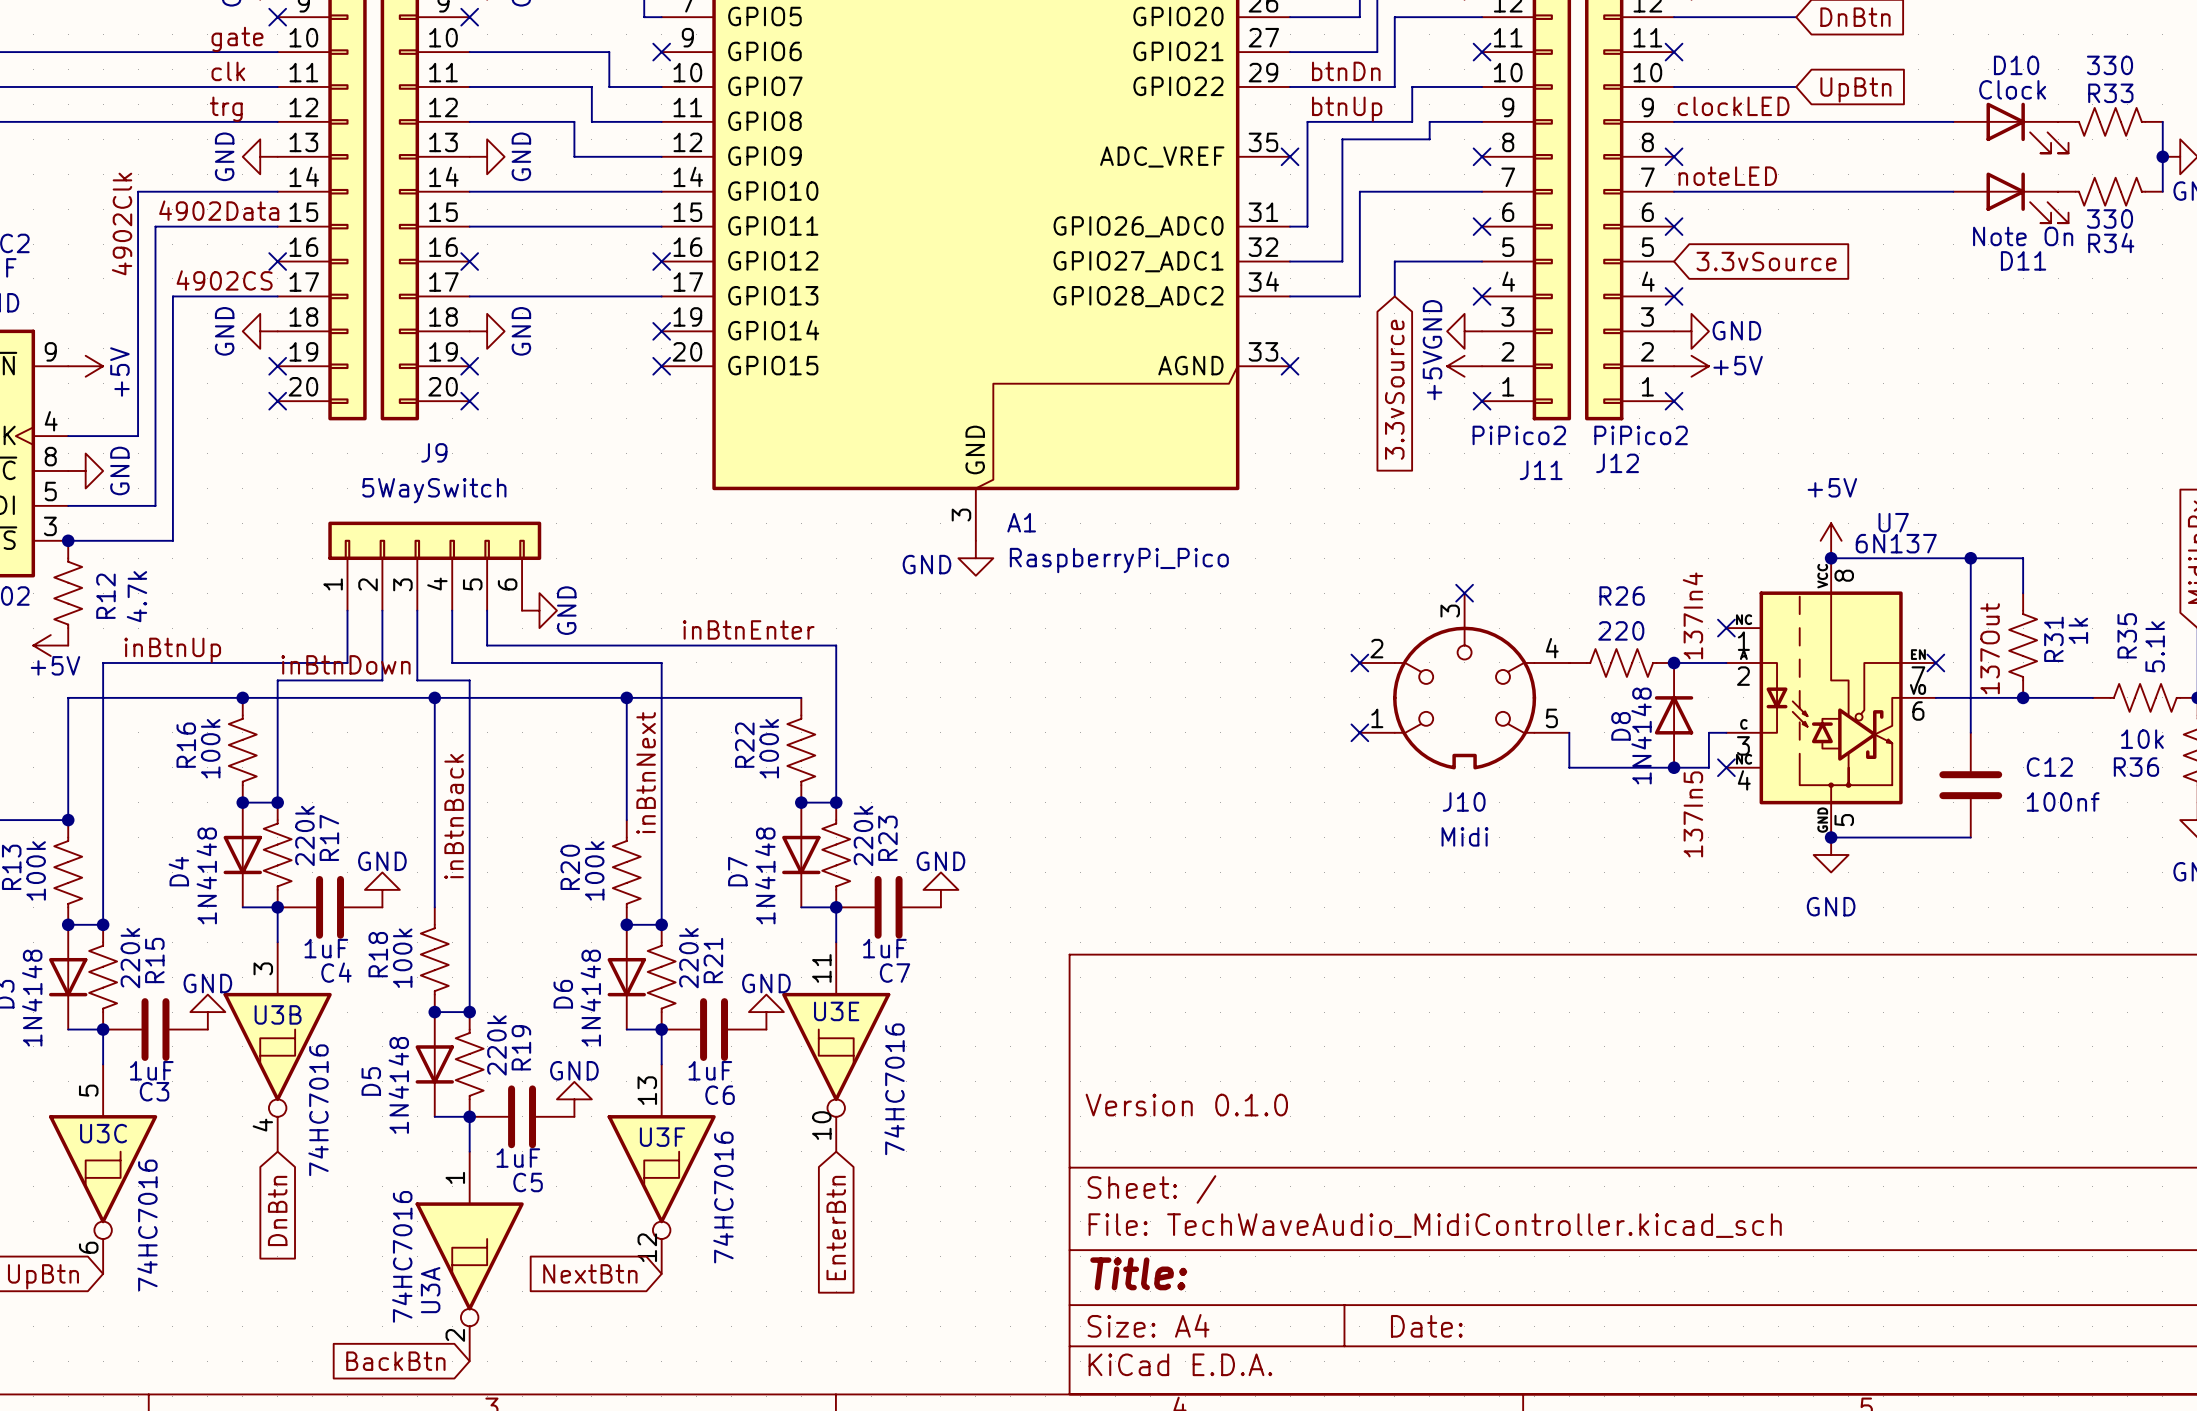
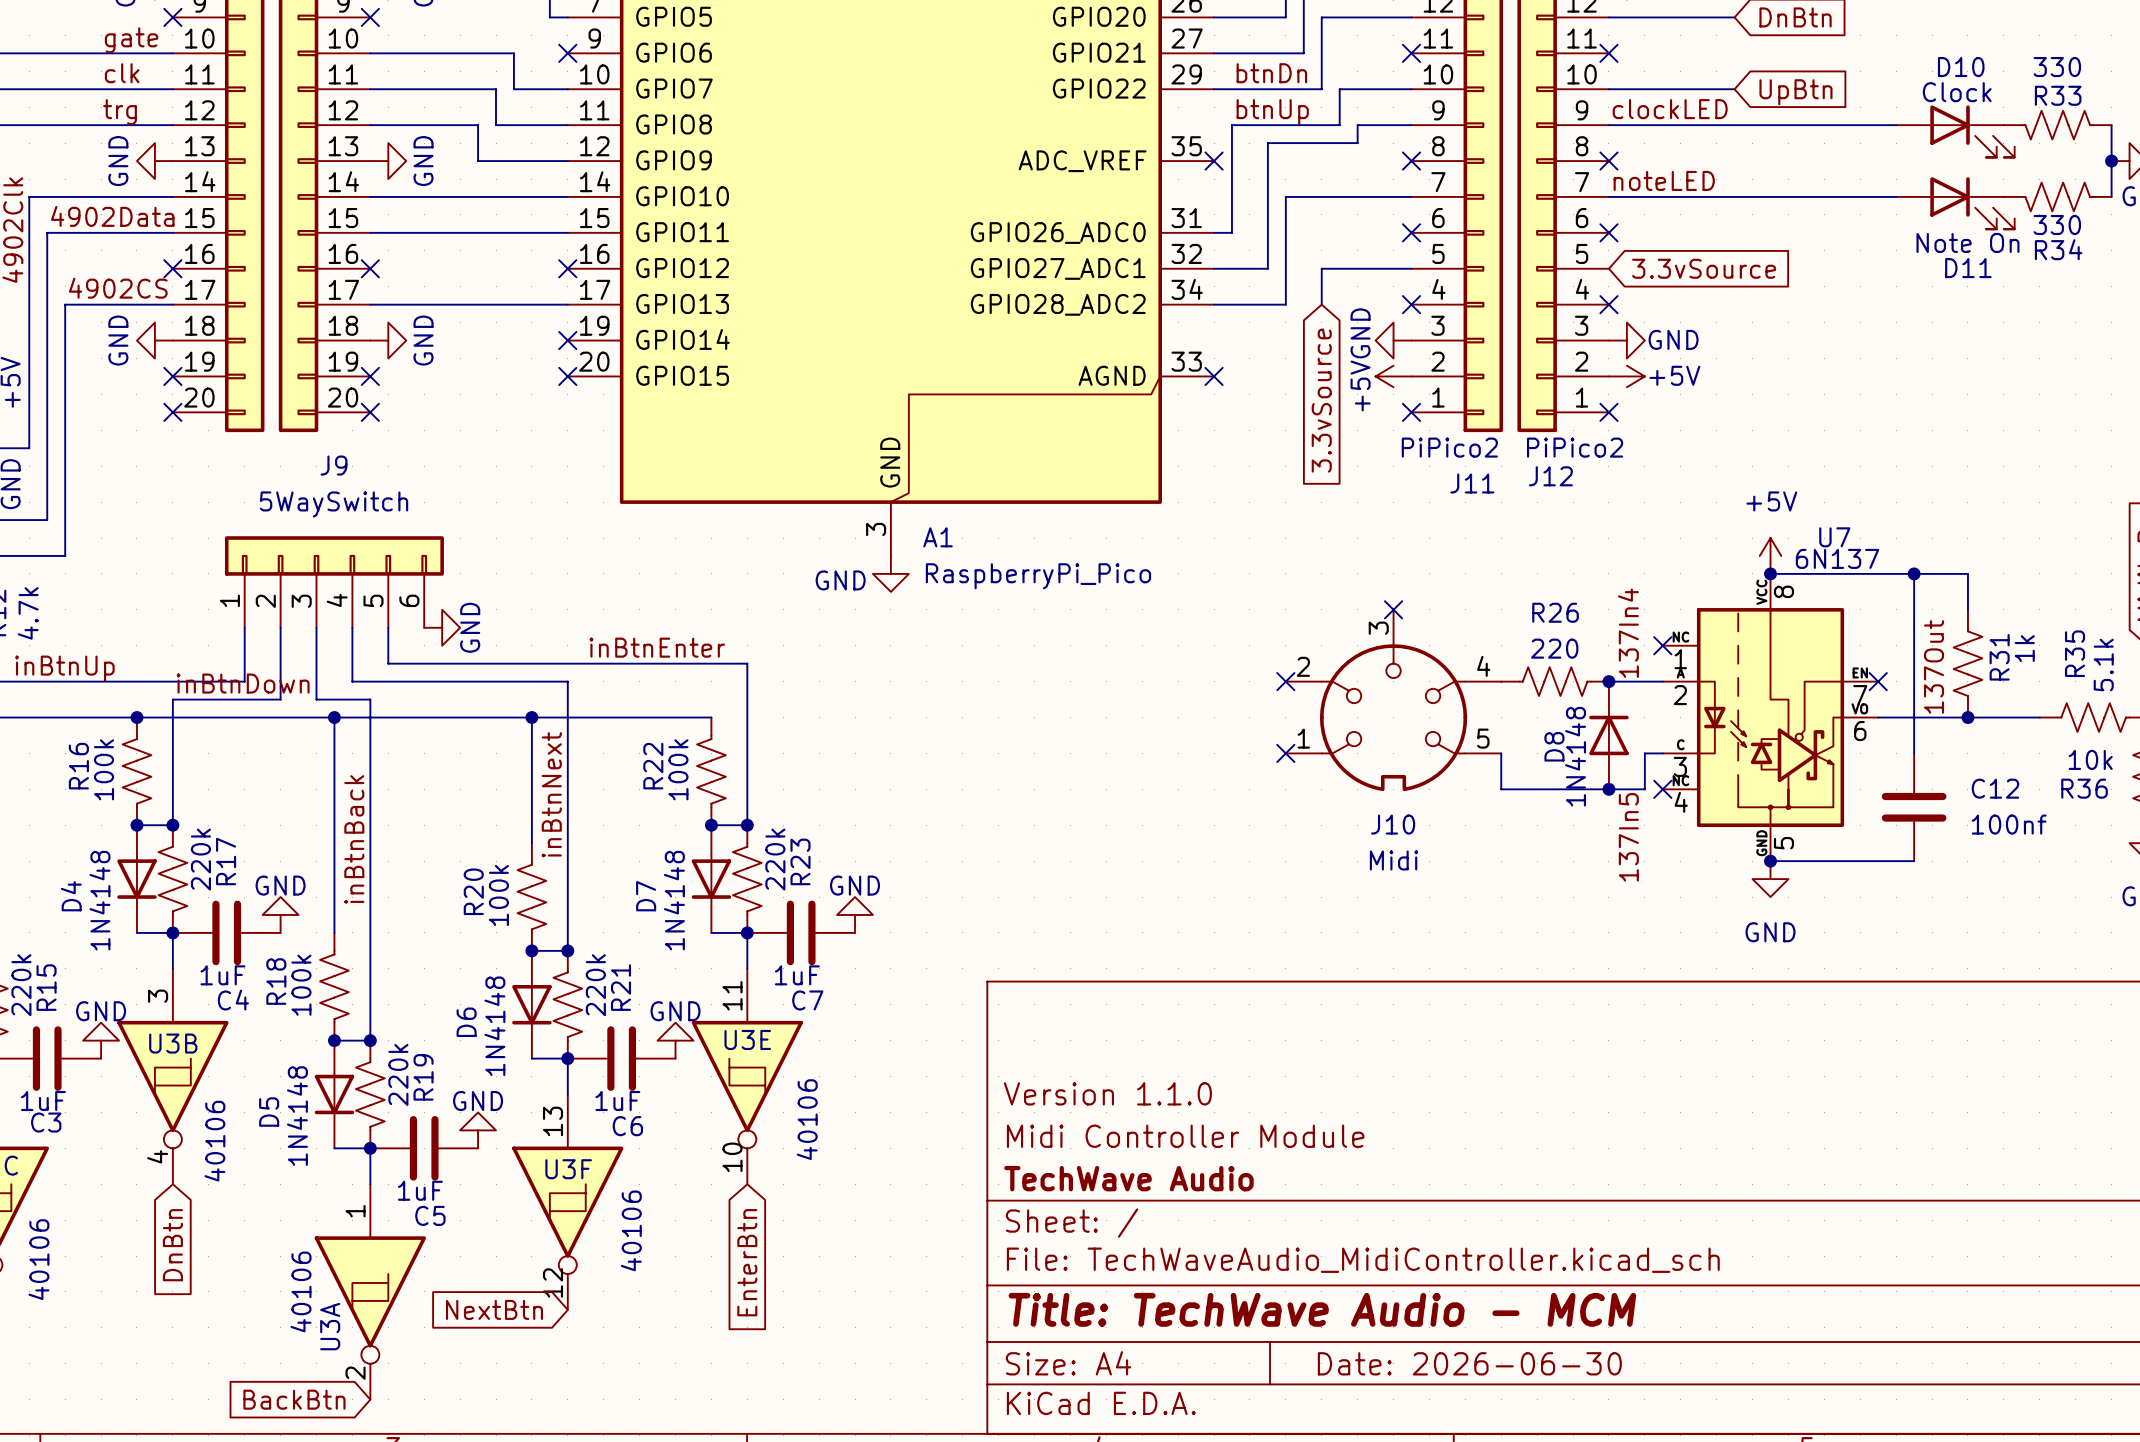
title block: none -> Version 1.1.0 (1107, 1093)
U3E value: 74HC7016 (894, 1089) -> 40106 (807, 1119)
title block: Version 0.1.0 (1186, 1105) -> Midi Controller Module (1185, 1136)
U3B value: 74HC7016 (318, 1110) -> 40106 (214, 1141)
title block: none -> TechWave Audio (1128, 1178)
U3F value: 74HC7016 (723, 1197) -> 40106 (631, 1230)
U3C value: 74HC7016 (147, 1225) -> 40106 (38, 1259)
U3A value: 74HC7016 (402, 1256) -> 40106 (301, 1291)
title block: Title: (1138, 1273) -> Title: TechWave Audio - MCM (1322, 1309)
title block: Date: (1426, 1326) -> Date: 2026-06-30 (1469, 1363)

